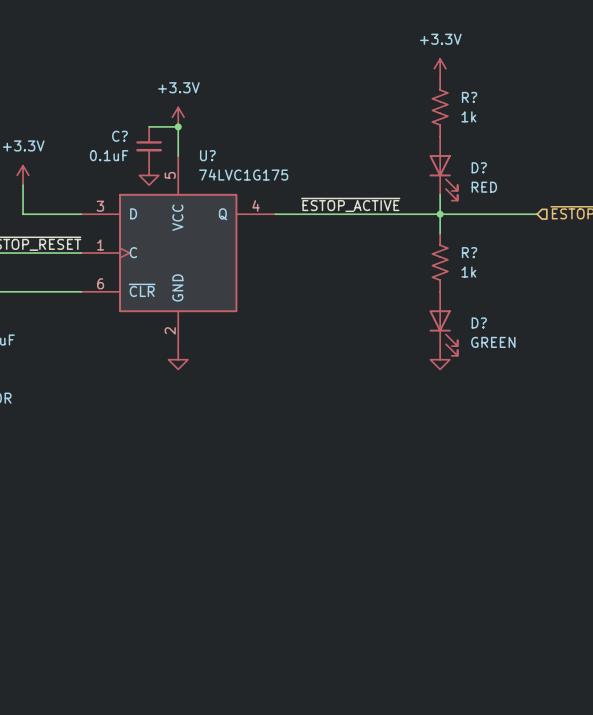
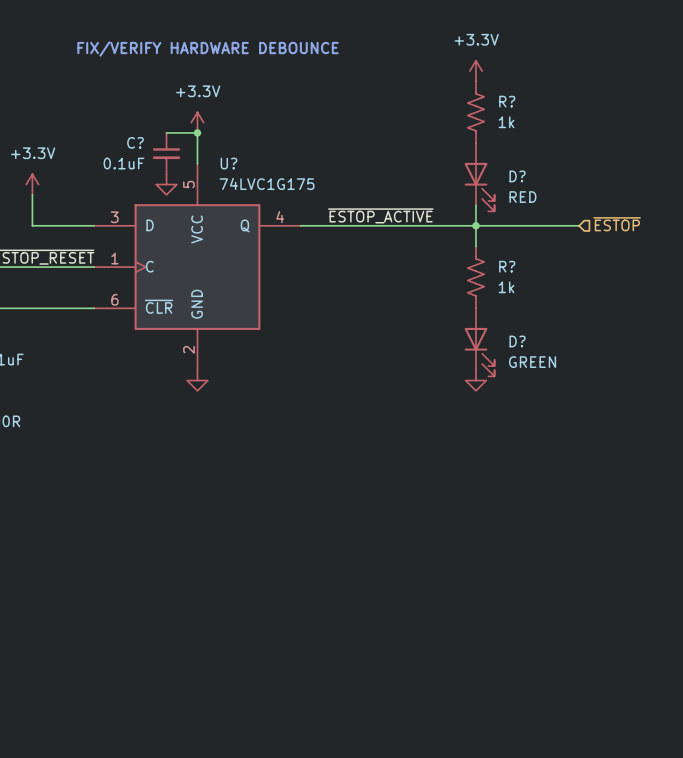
text: none -> FIX/VERIFY HARDWARE DEBOUNCE (208, 49)

